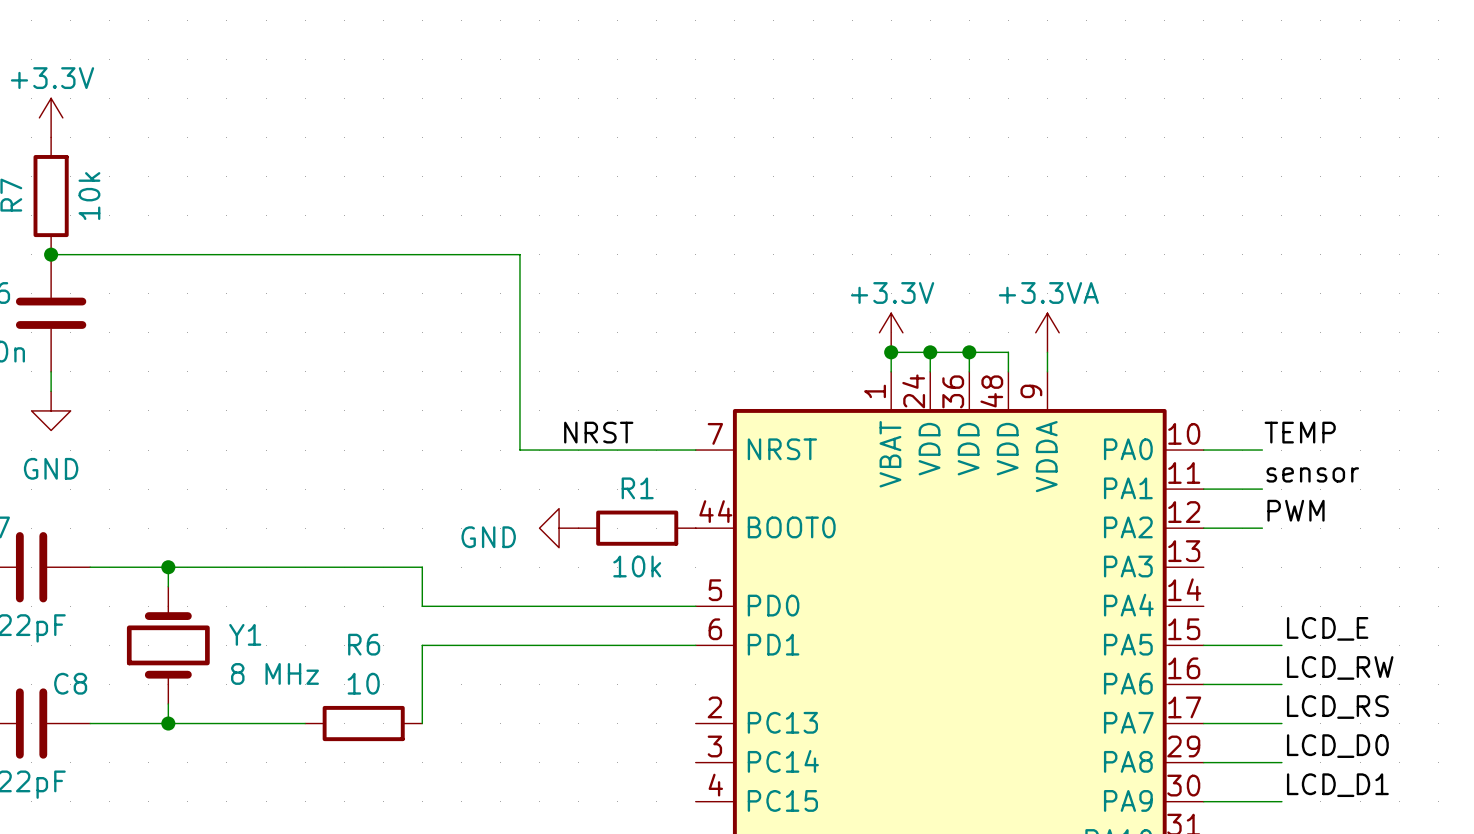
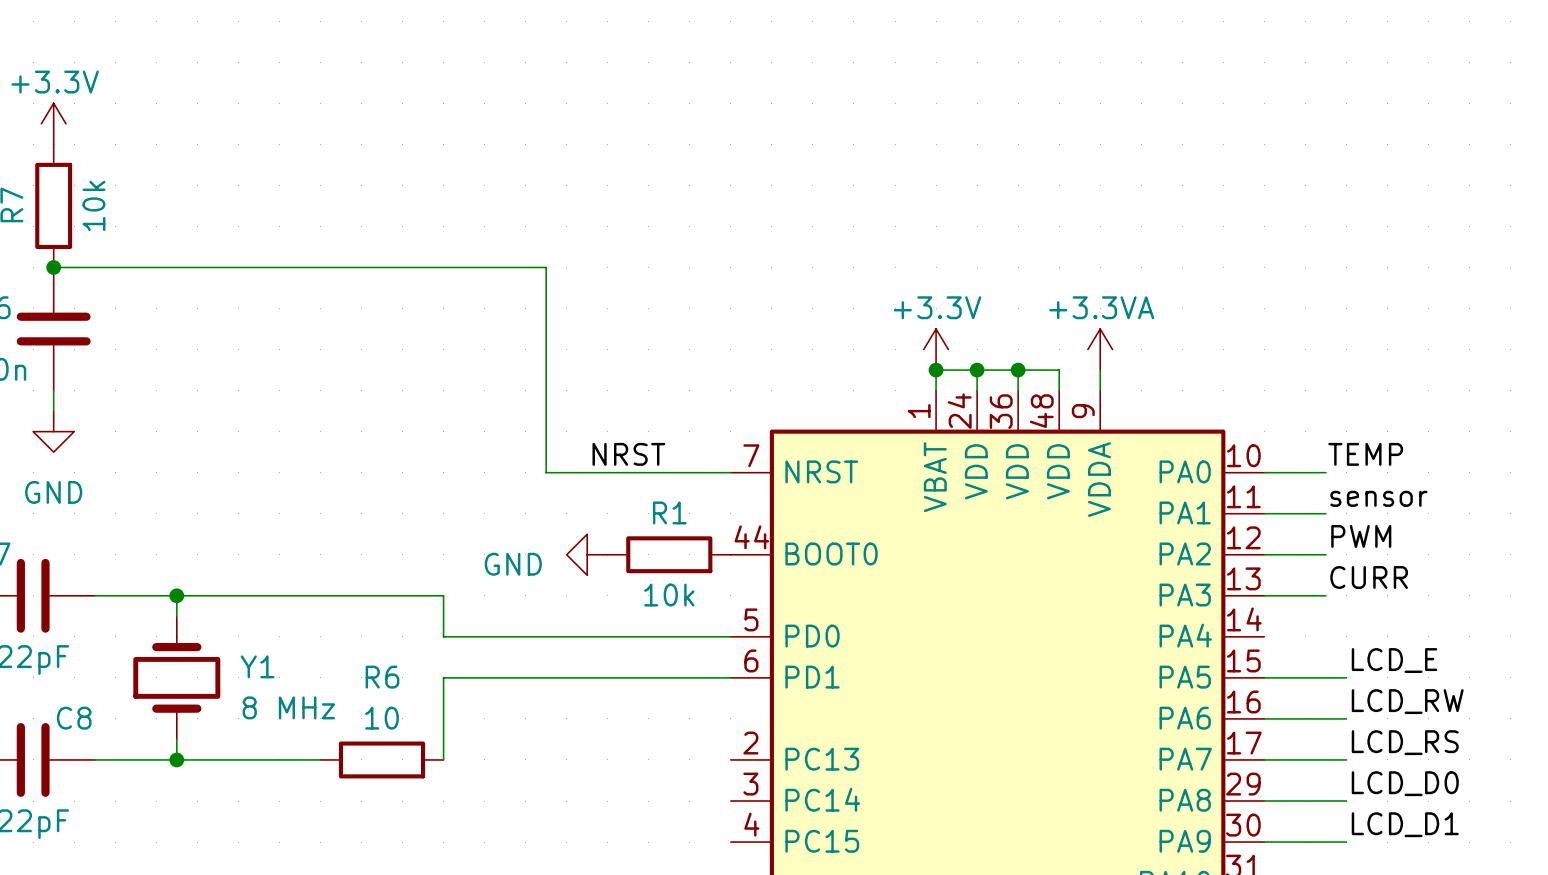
label: none -> CURR (1369, 577)
wire: none -> (1264, 595) (1325, 595)

